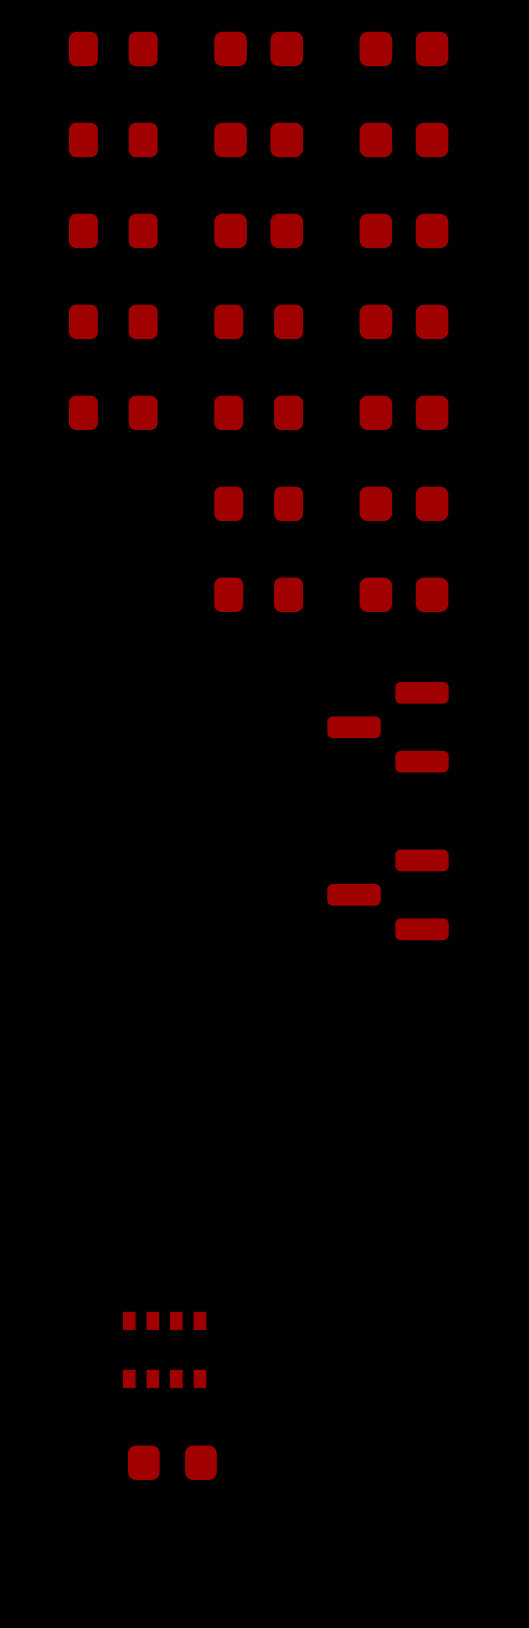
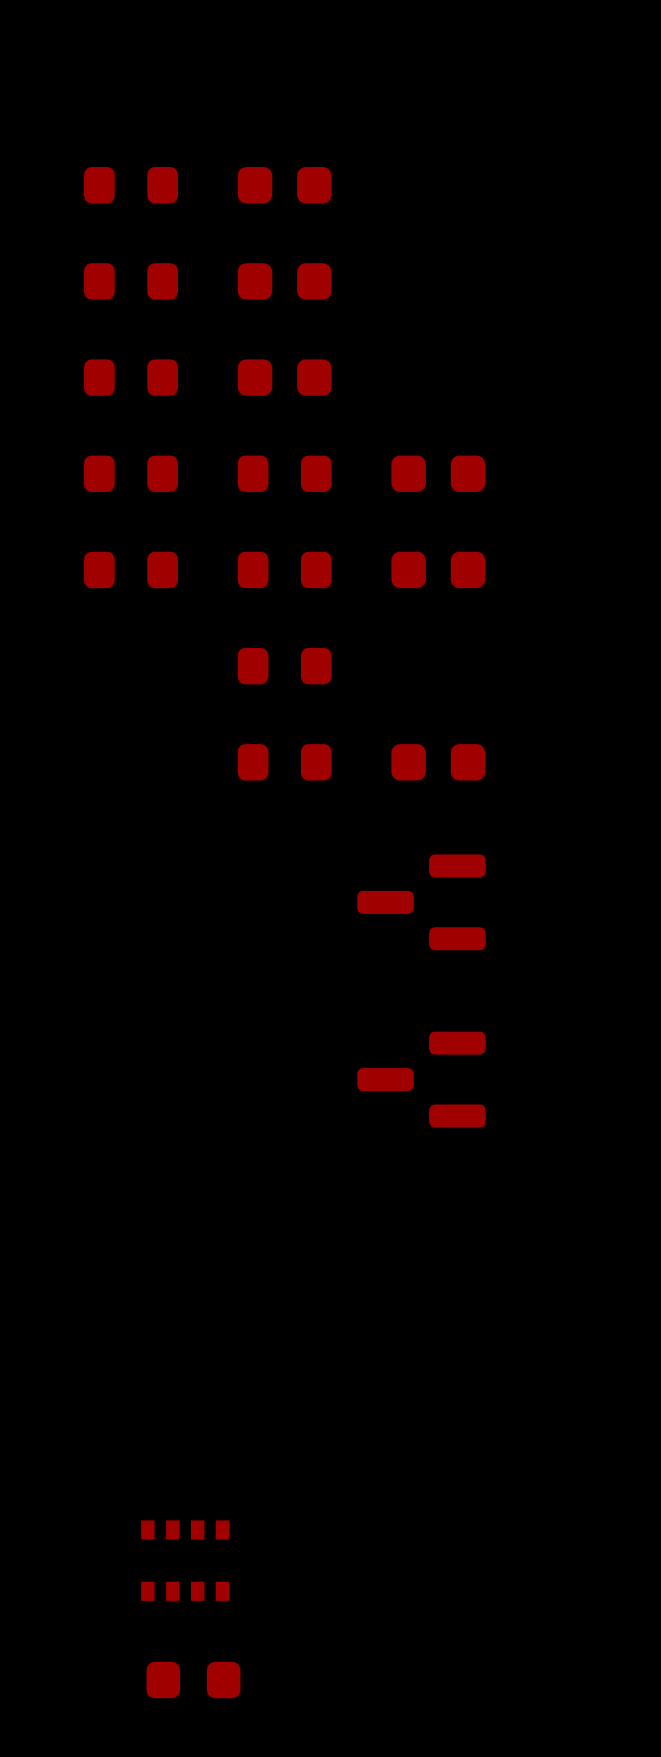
part: (403, 49) -> none
part: (403, 139) -> none
part: (403, 230) -> none
part: (403, 503) -> none

